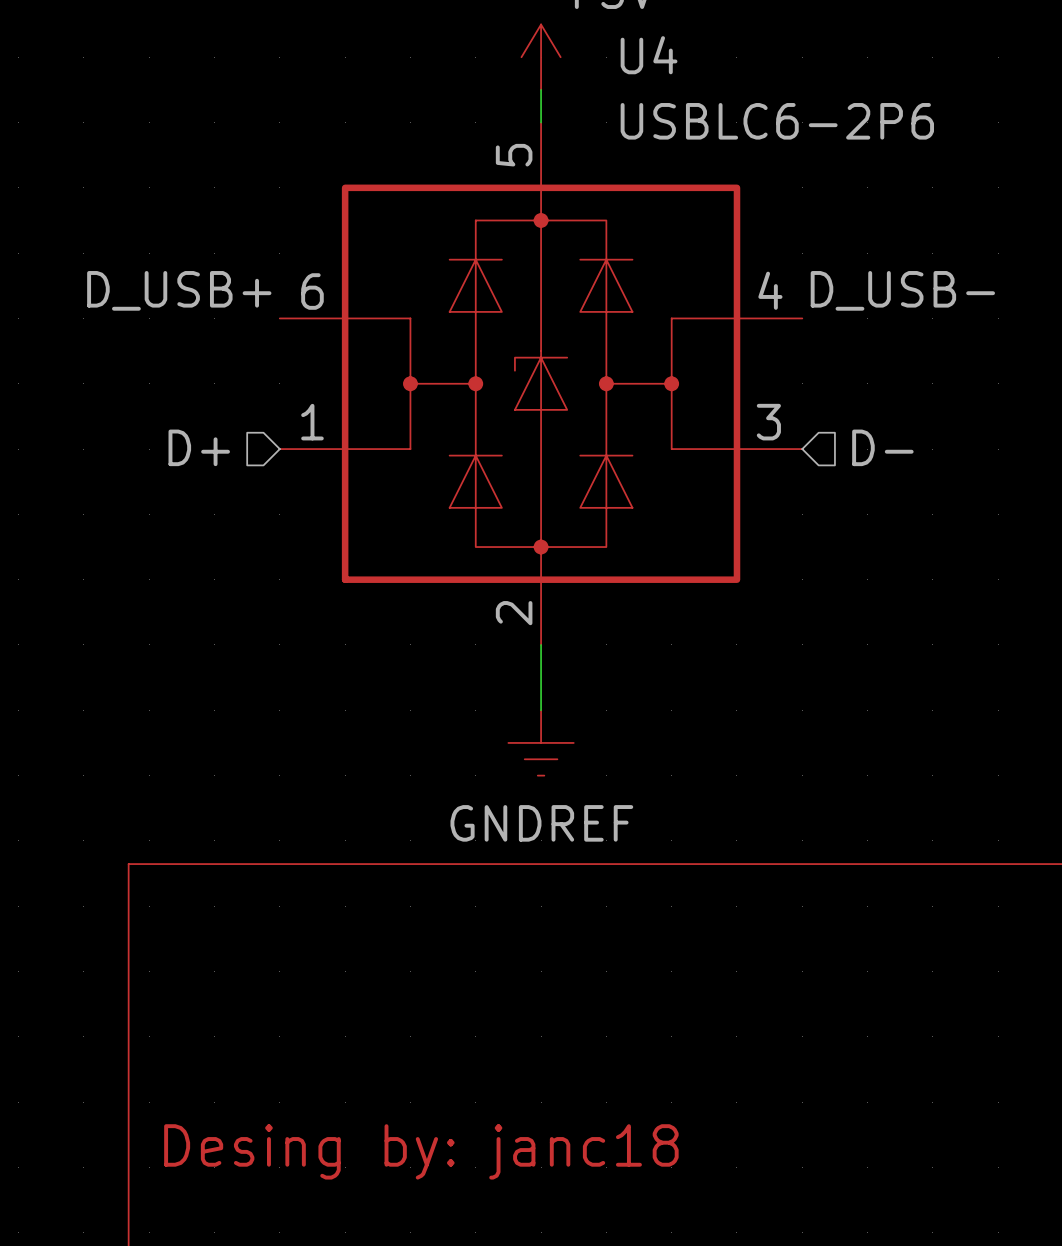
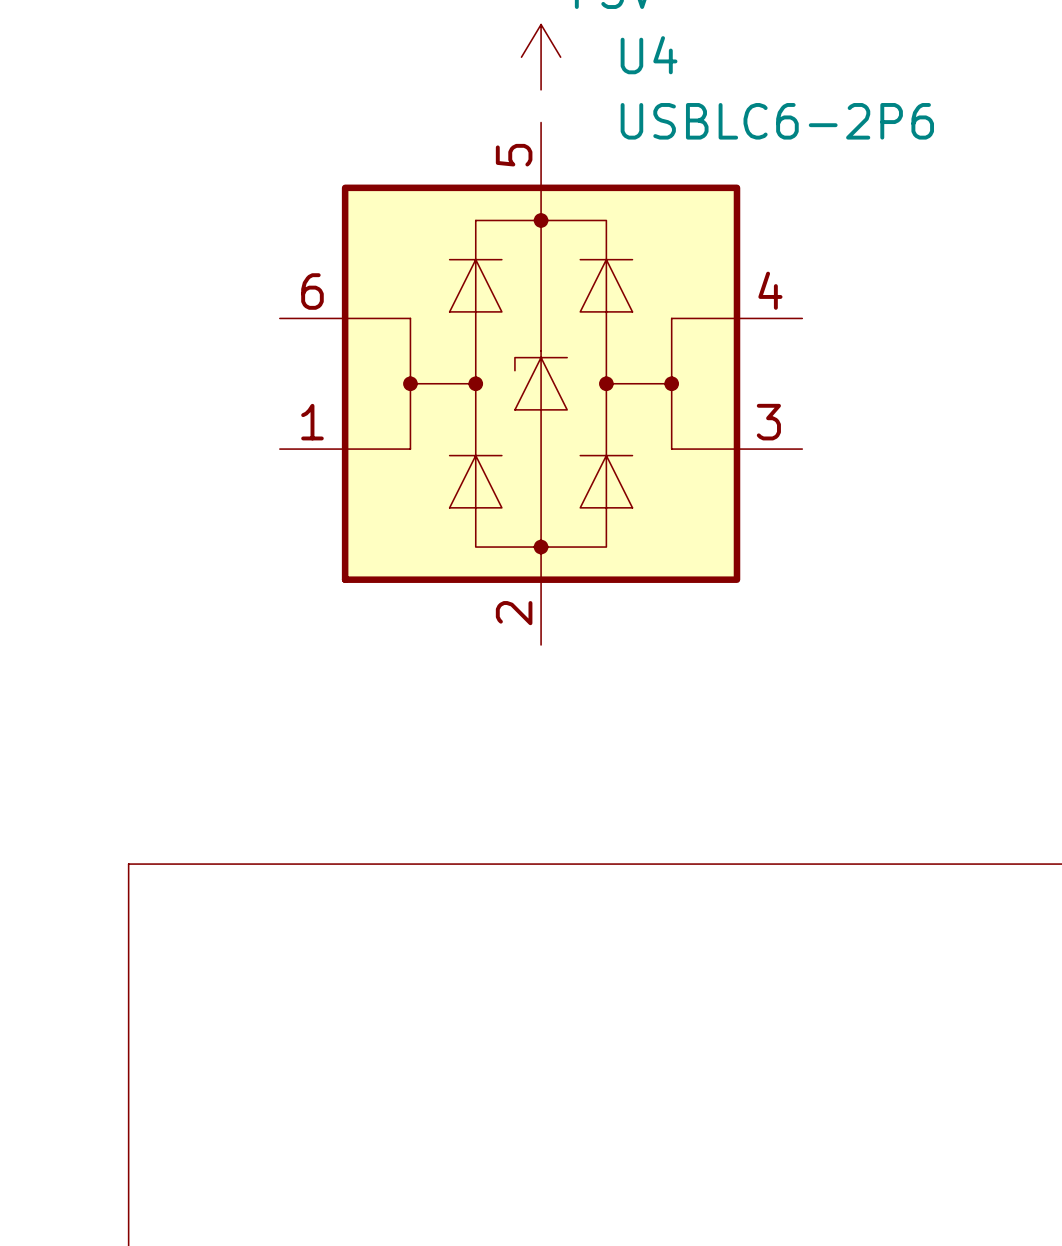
wire: (541, 89) (541, 122) -> none
label: D_USB+ (179, 290) -> none
label: D_USB- (902, 290) -> none
hierarchical label: D+ (199, 447) -> none
hierarchical label: D- (882, 447) -> none
wire: (541, 644) (541, 710) -> none
power symbol: GNDREF (541, 742) -> none
title block: Desing by: janc18 (421, 1151) -> none

